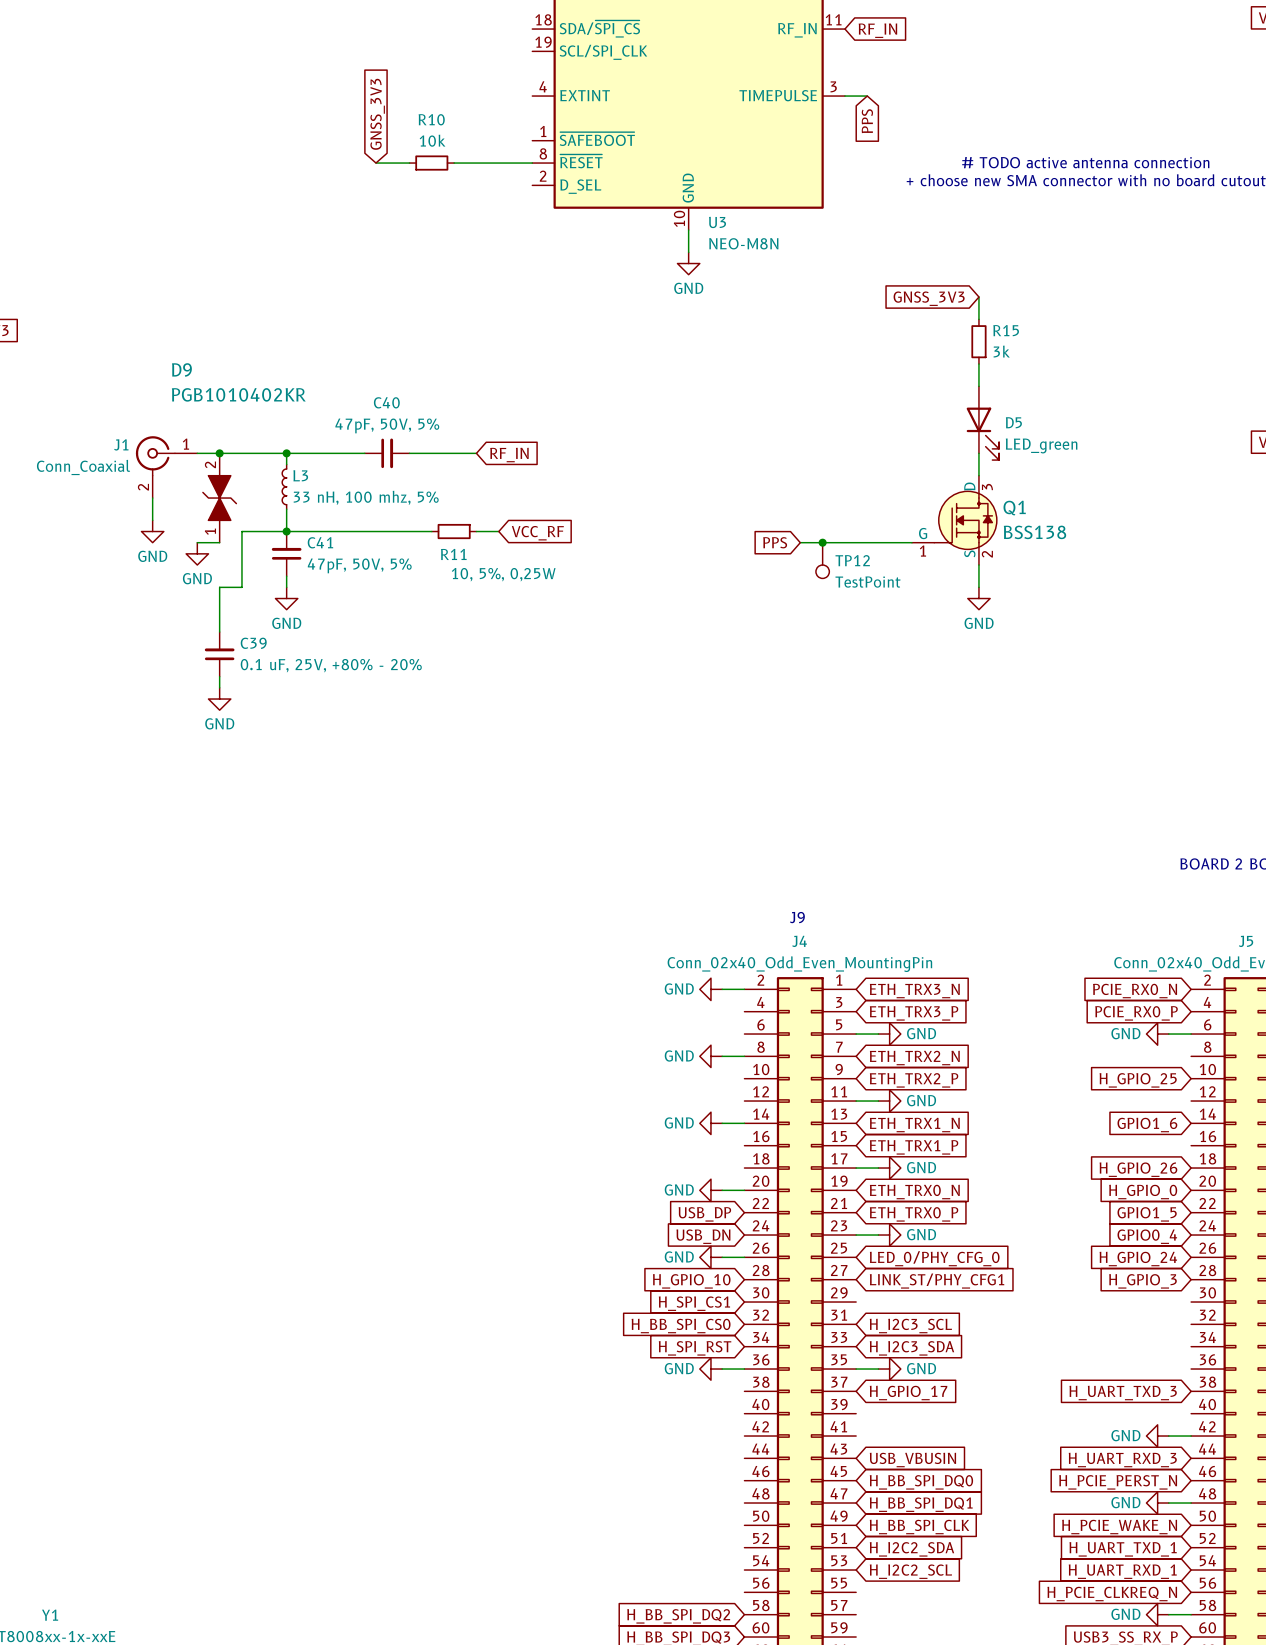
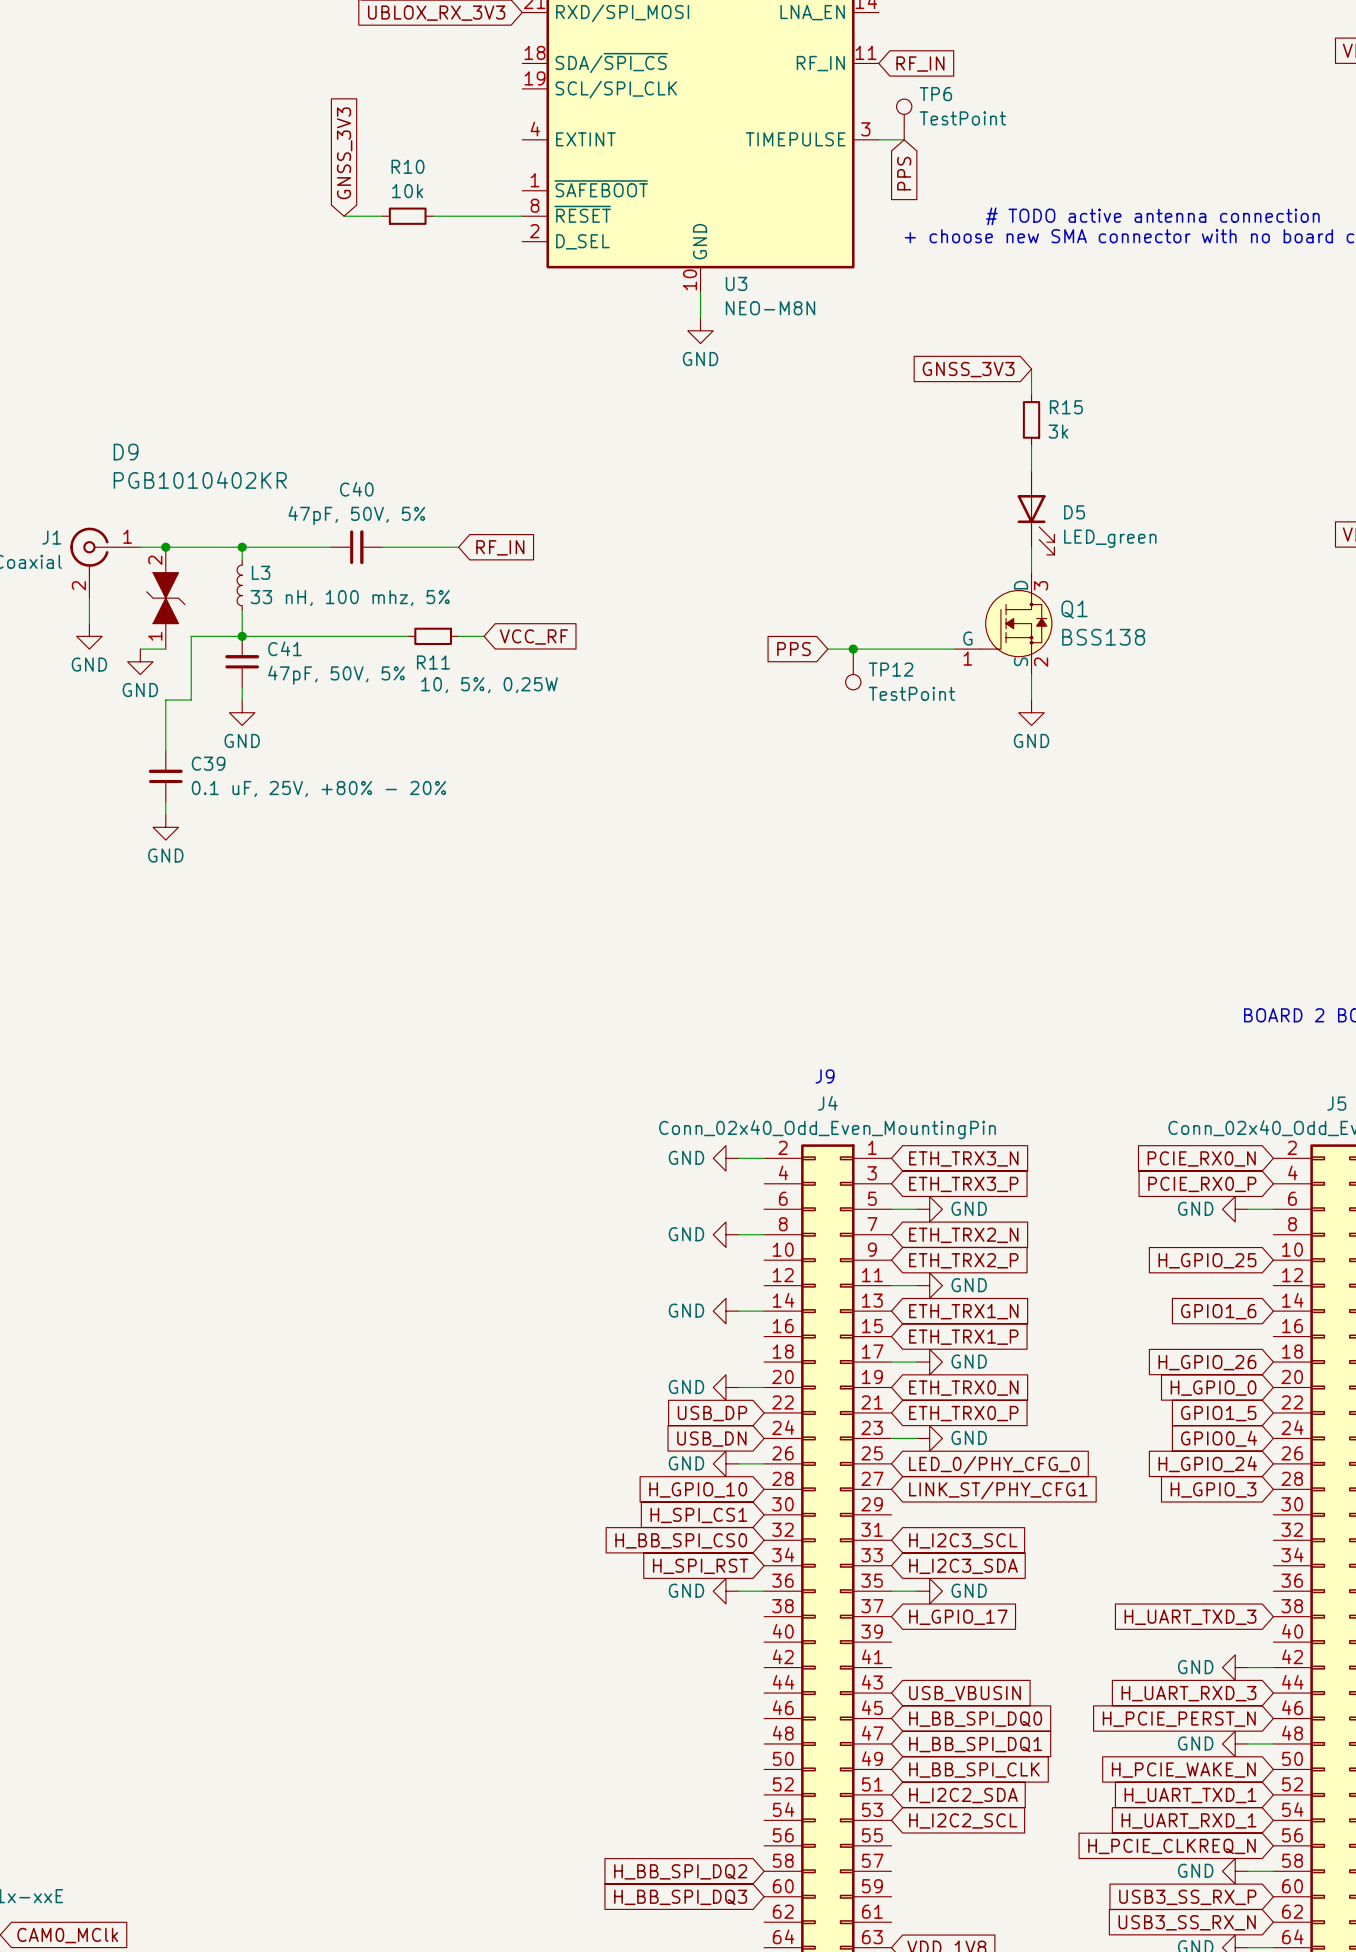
TP6: none -> TestPoint (904, 119)

